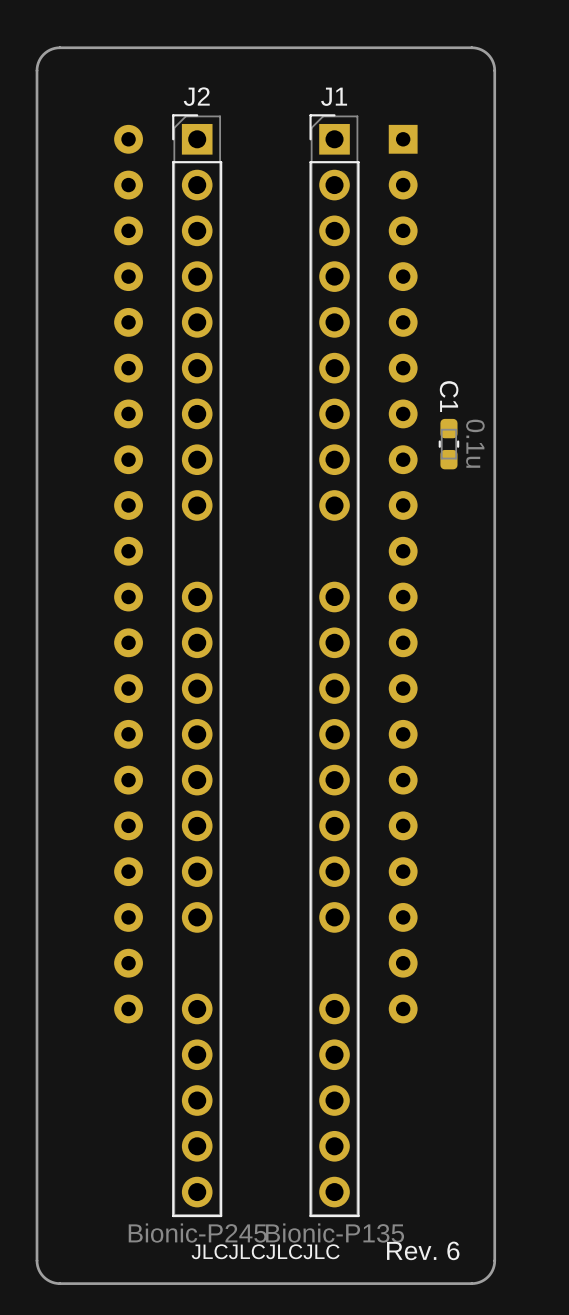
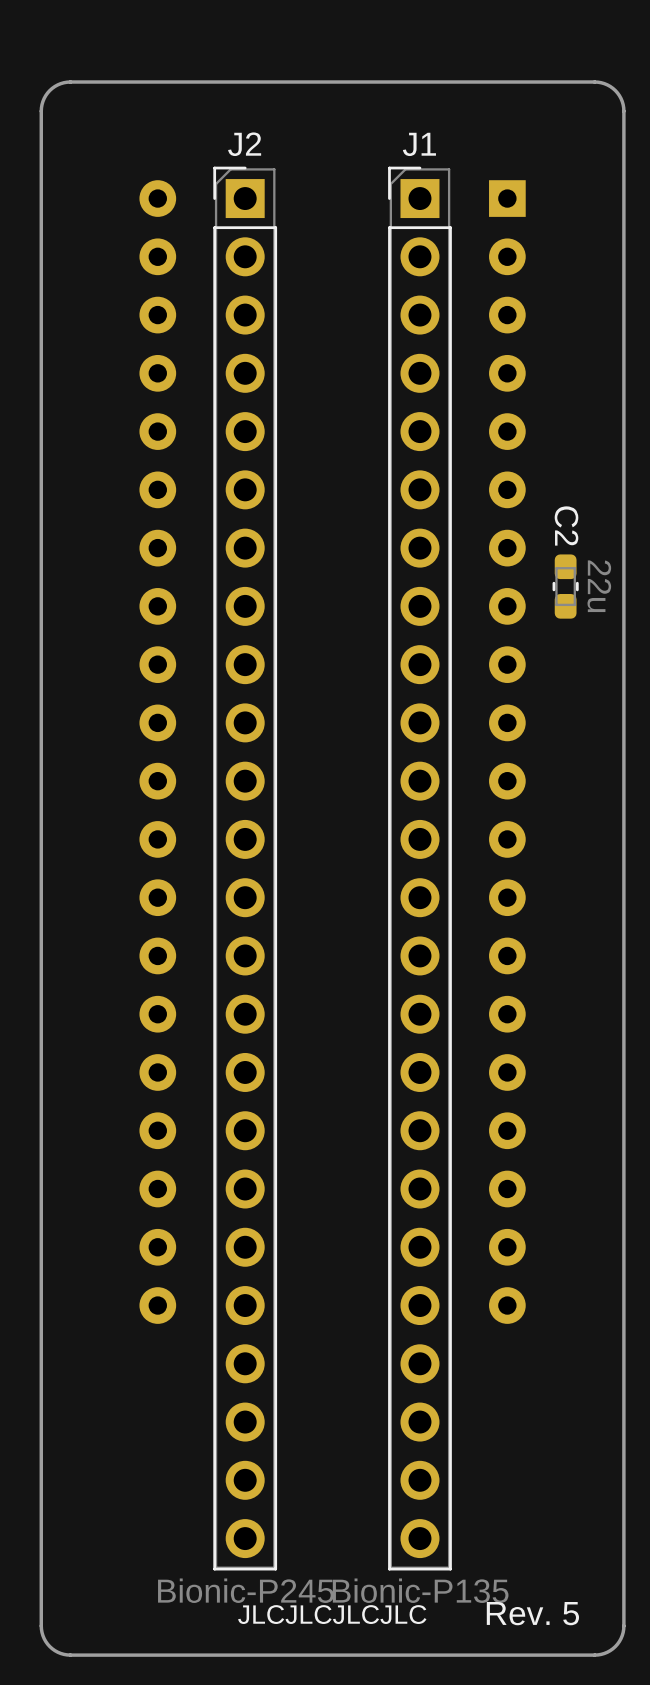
J2 footprint: [172, 114, 223, 1218] -> [213, 166, 278, 1571]
J1 footprint: [309, 114, 360, 1218] -> [388, 166, 452, 1571]
C1 name: C1 (449, 396) -> C2 (566, 525)
C1 value: 0.1u (475, 443) -> 22u (599, 586)
text: Rev. 6 (423, 1250) -> Rev. 5 (532, 1613)

